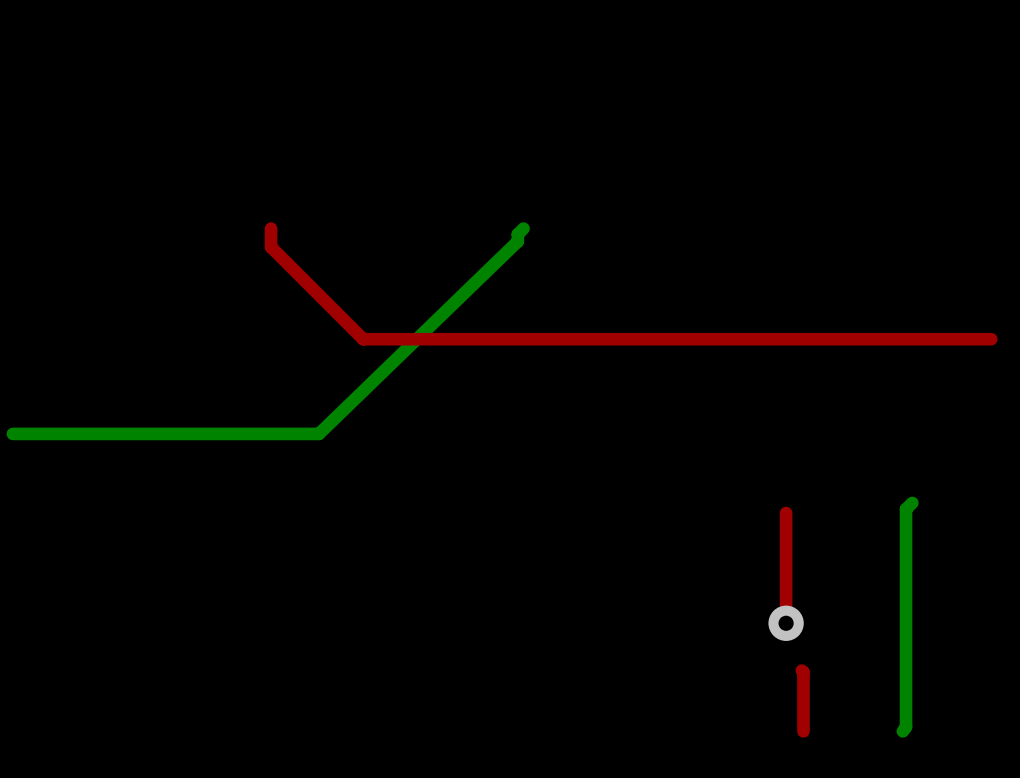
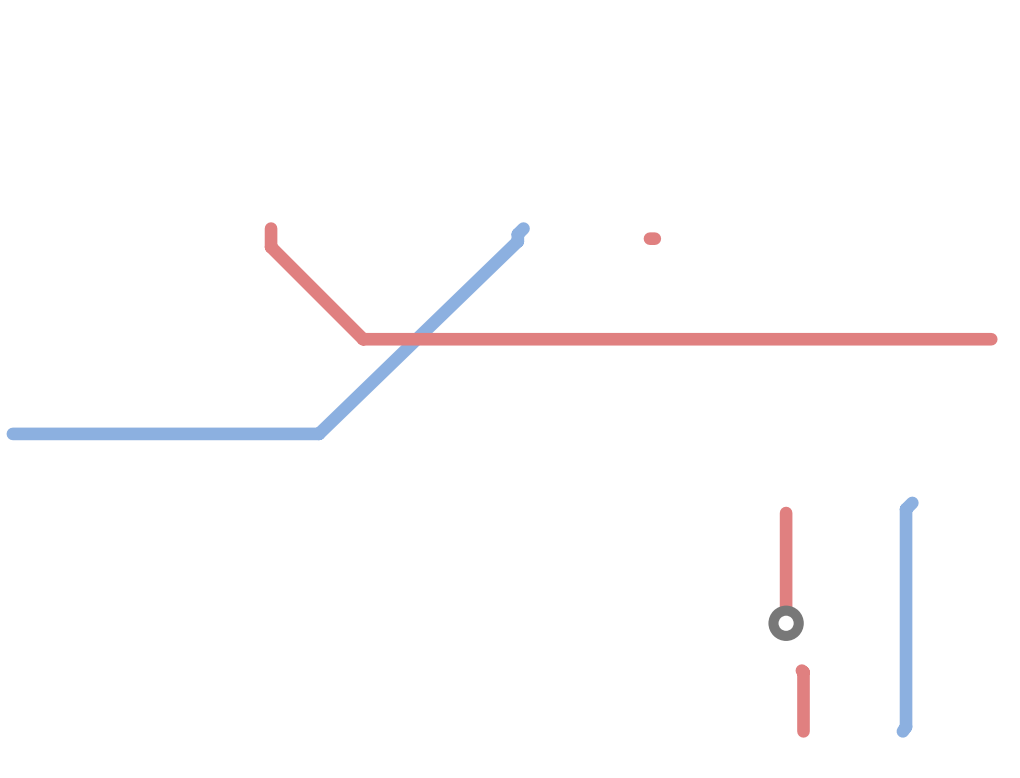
top track: none -> (649, 238) (654, 238)

